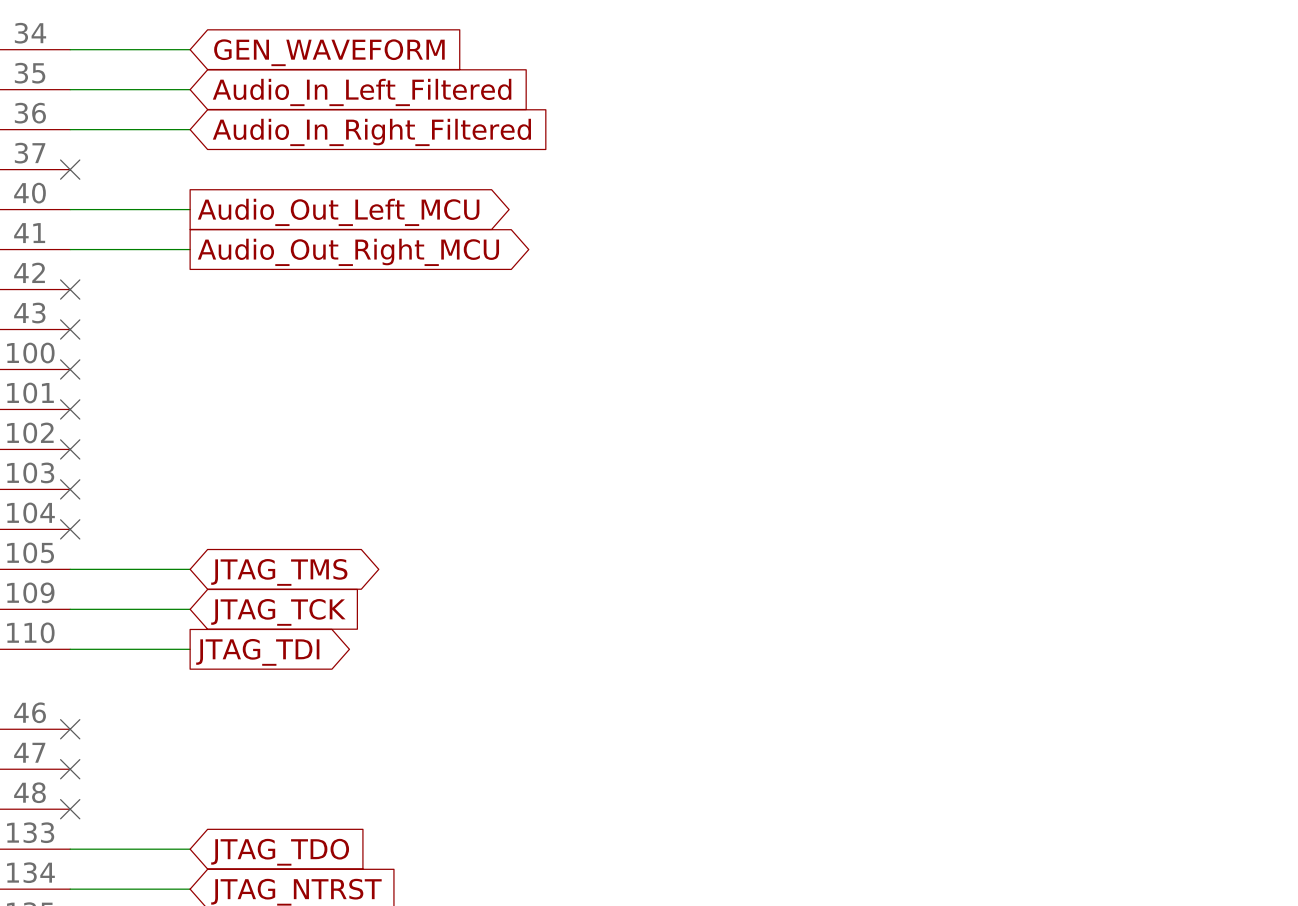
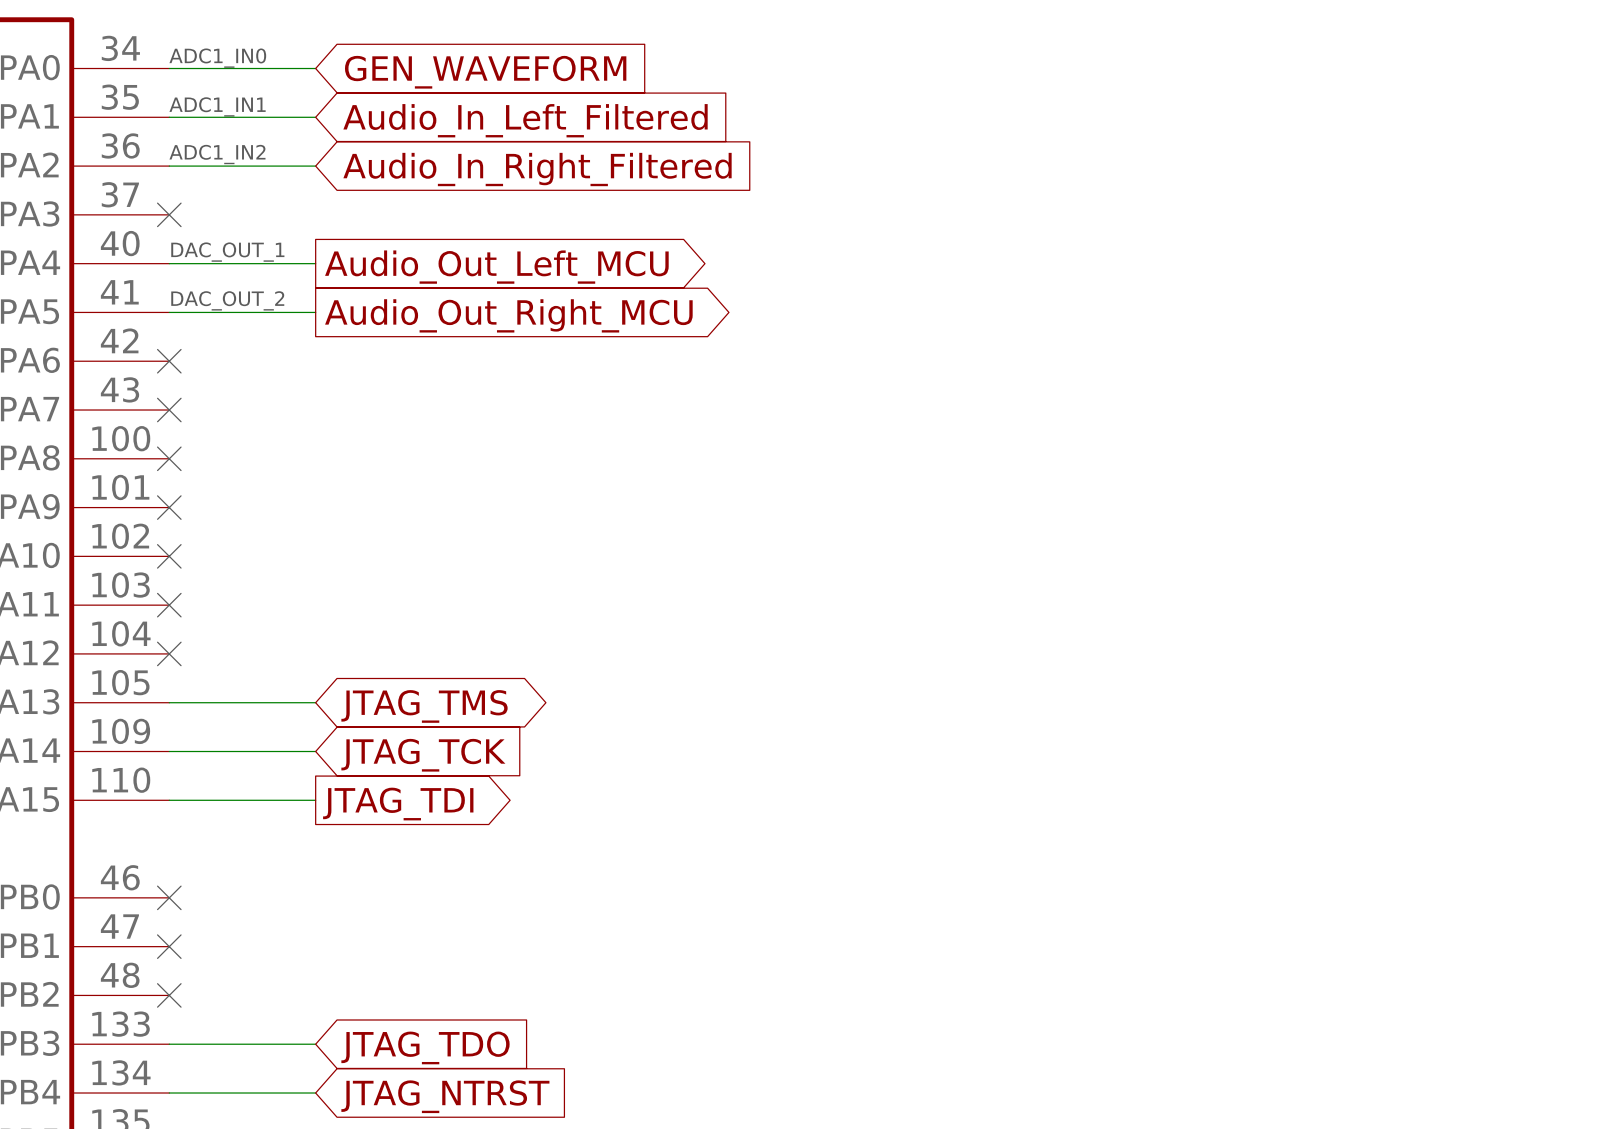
text: none -> ADC1_IN0 (217, 58)
text: none -> ADC1_IN1 (217, 106)
text: none -> ADC1_IN2 (217, 154)
text: none -> DAC_OUT_1 (227, 252)
text: none -> DAC_OUT_2 (227, 300)

